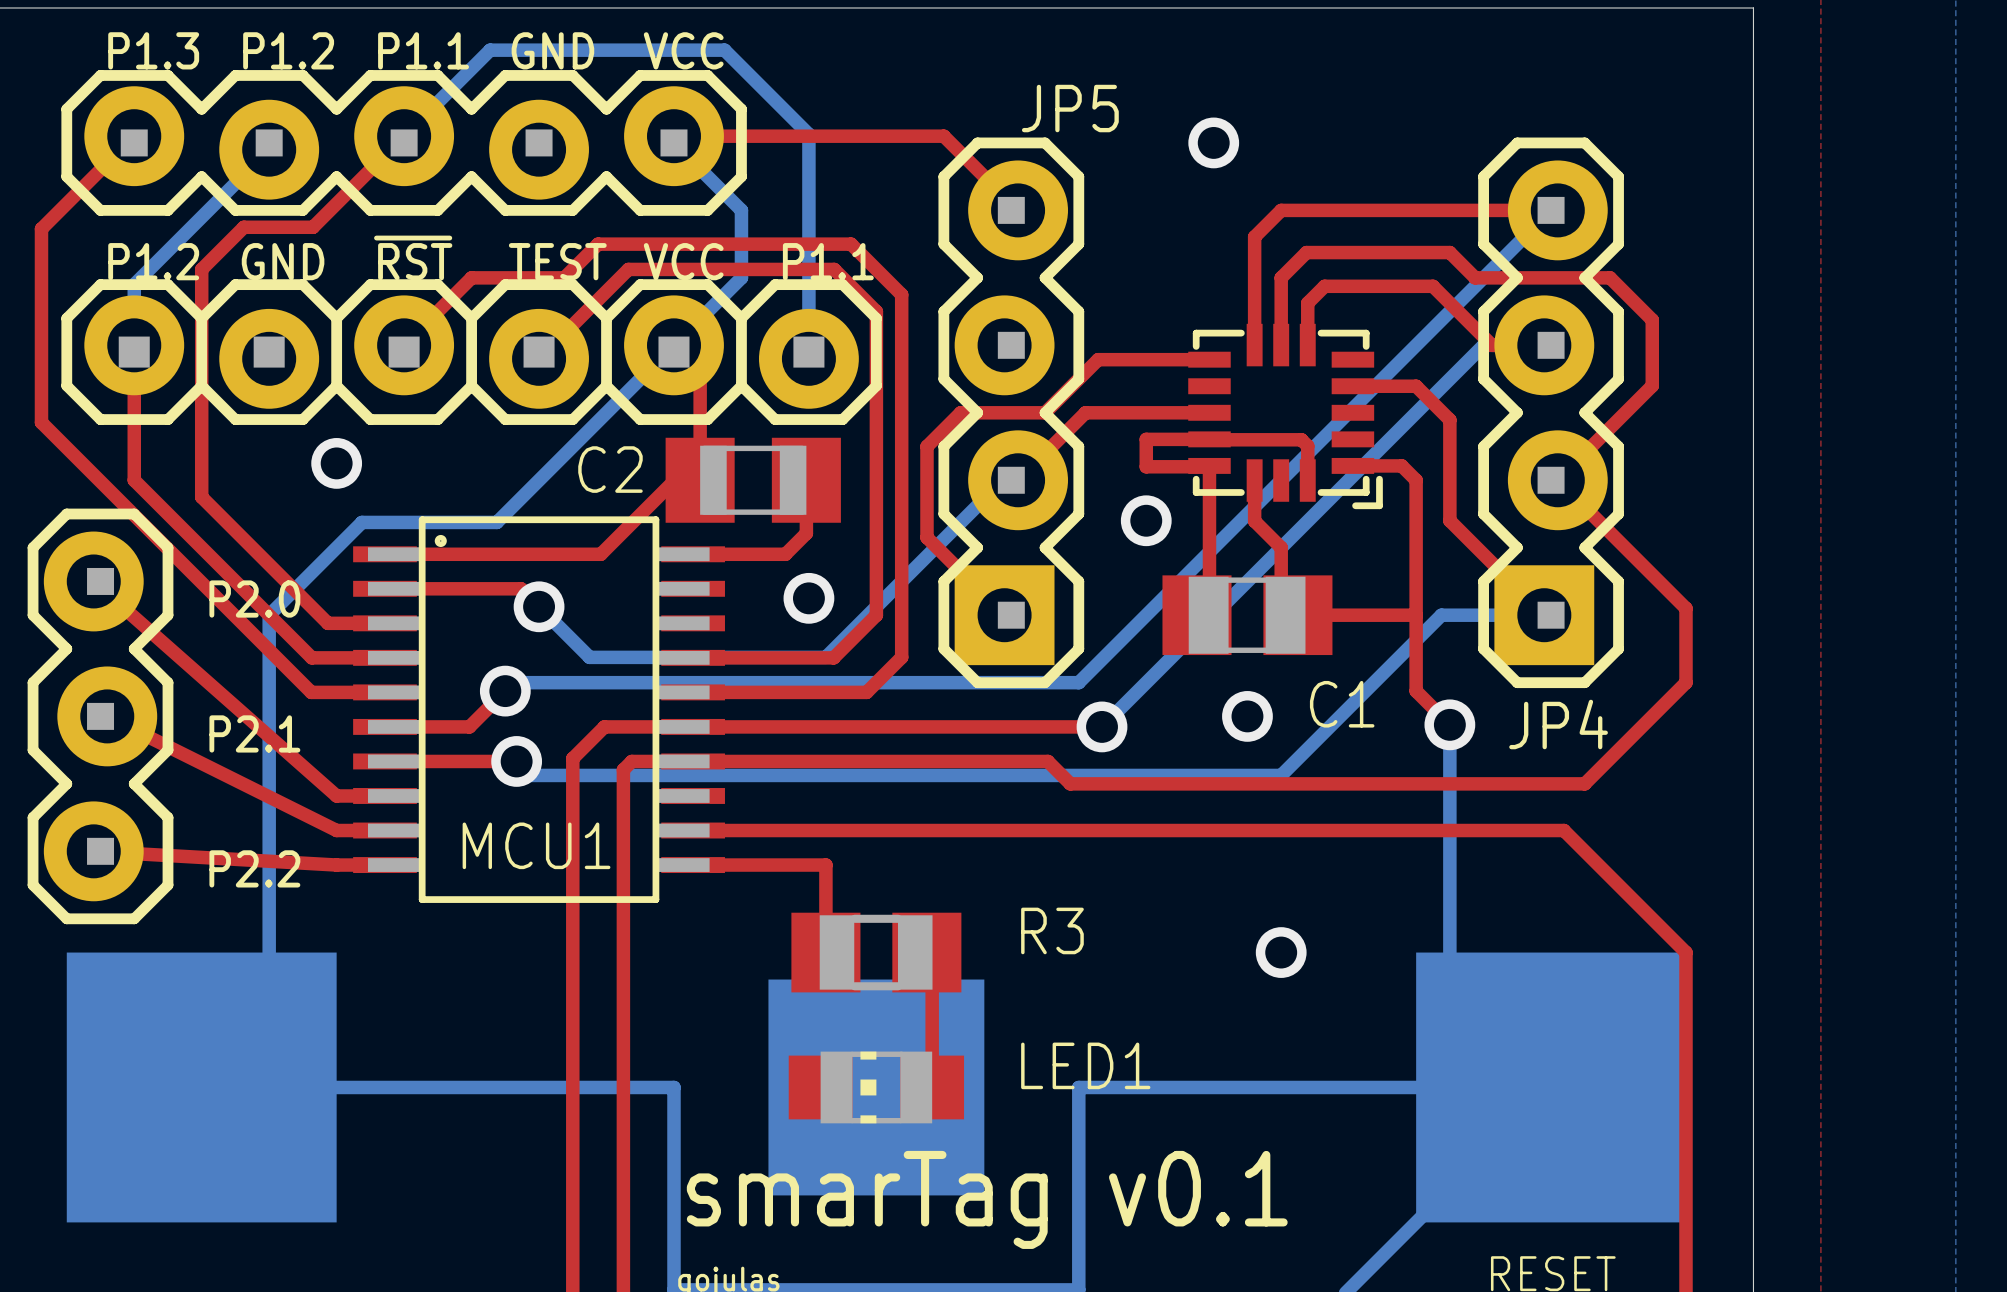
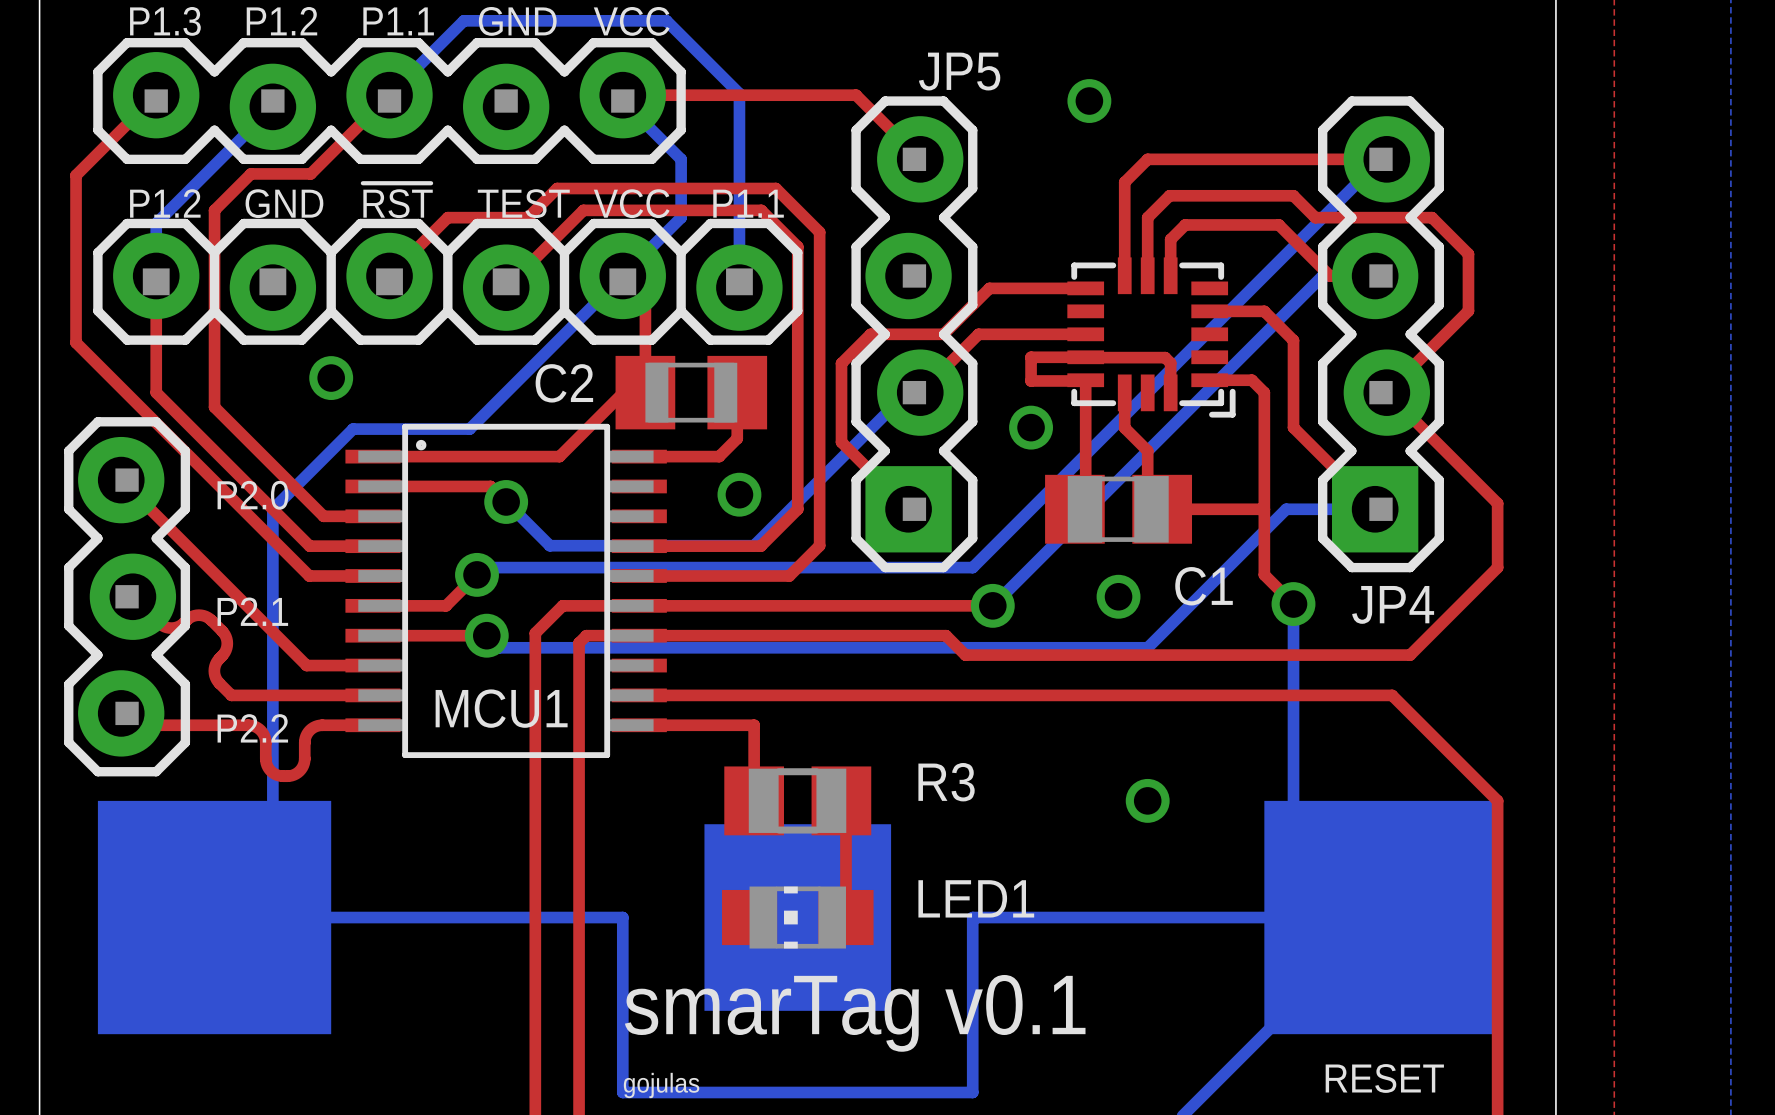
top track: (93, 581) (336, 795) -> (121, 480) (306, 665) (331, 665)
top track: (107, 716) (336, 830) -> (132, 596) (159, 623) (166, 627) (178, 626) (190, 617) (196, 615) (203, 615) (211, 620) (223, 632) (227, 643) (224, 652) (215, 664) (214, 675) (217, 681) (231, 695) (331, 695)
top track: (93, 851) (336, 865) -> (121, 713) (133, 725) (254, 726) (260, 730) (265, 738) (265, 761) (268, 767) (274, 773) (283, 776) (293, 774) (302, 767) (304, 761) (305, 738) (309, 730) (317, 725) (331, 725)

